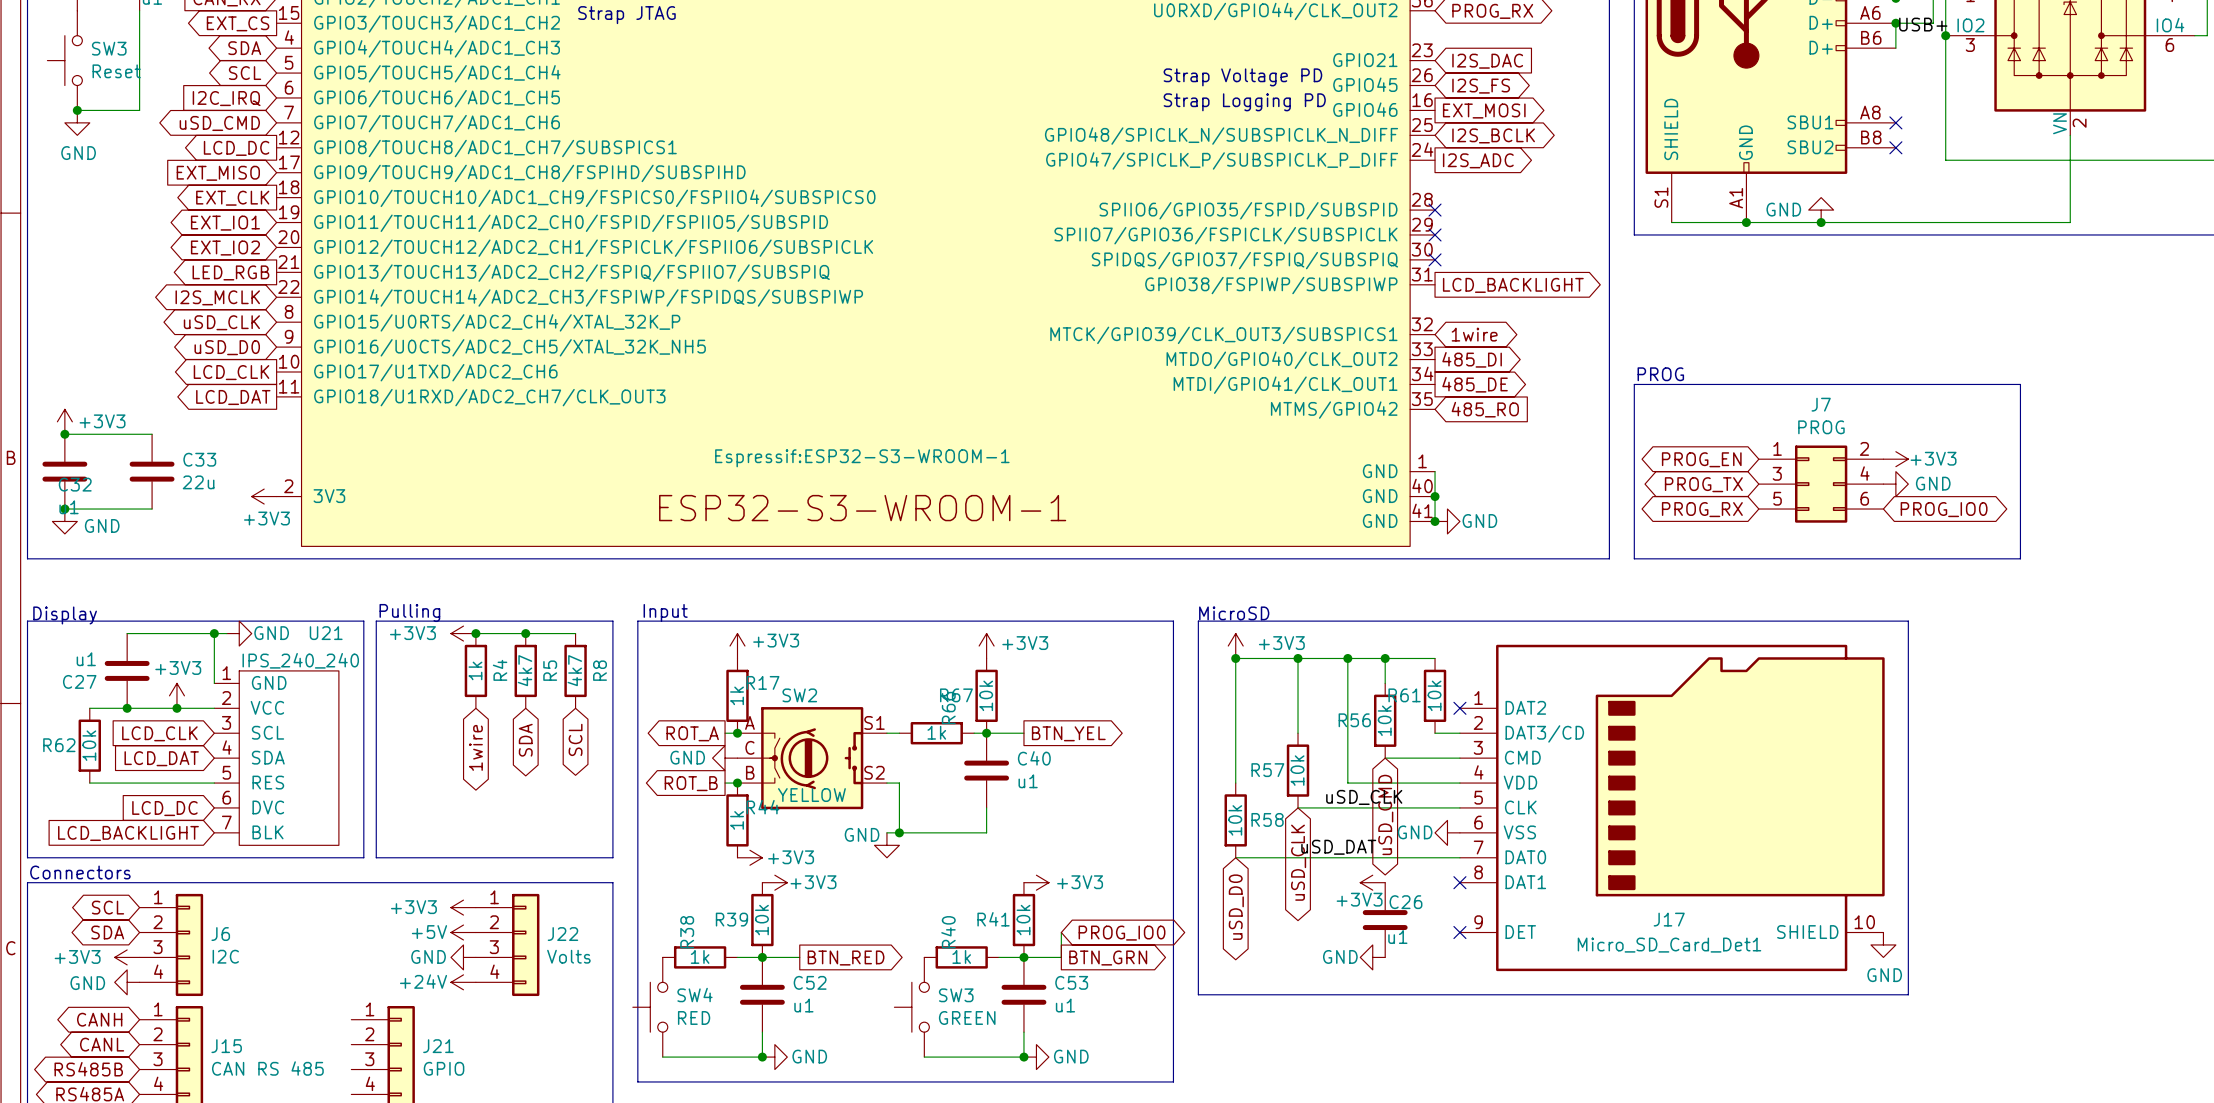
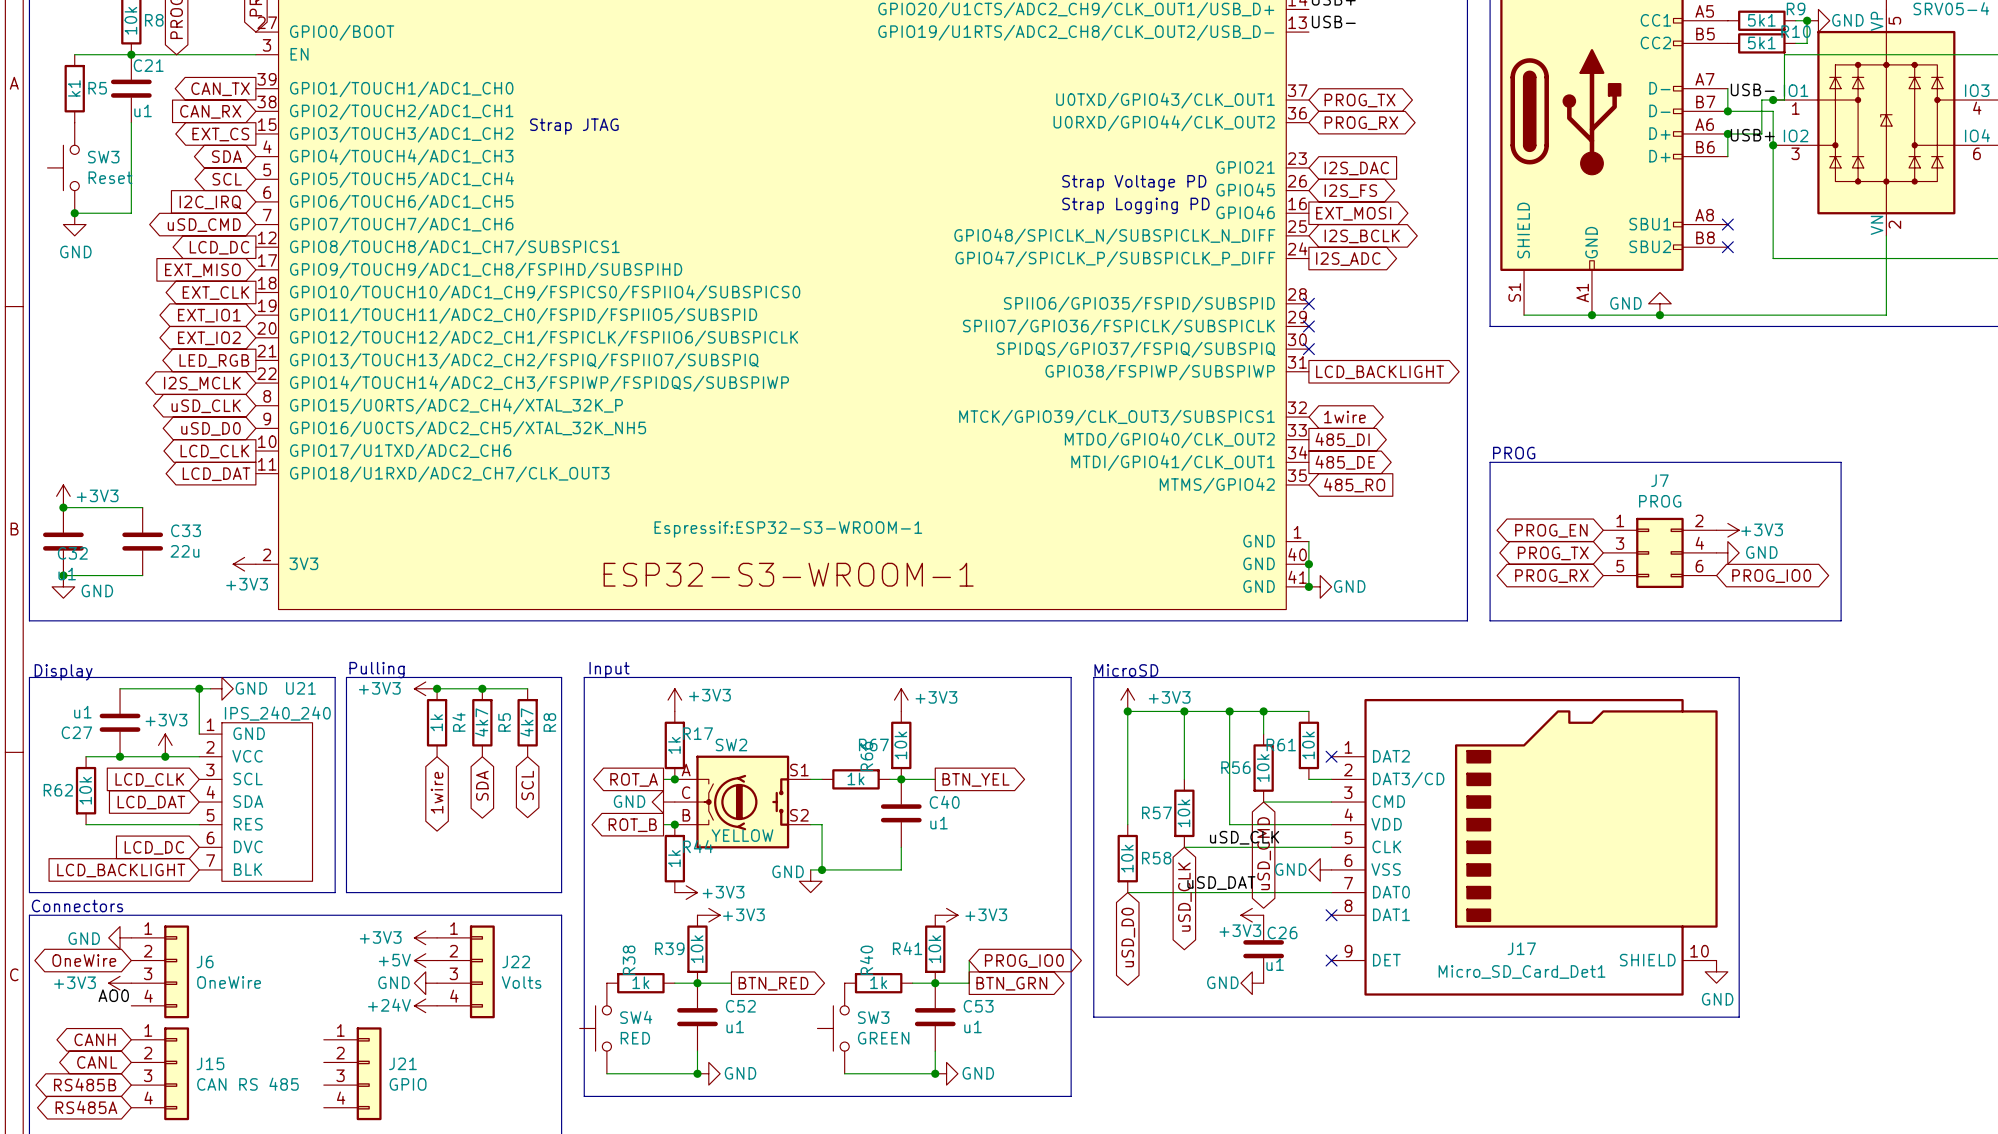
global label: SCL (108, 907) -> none
global label: SDA (107, 932) -> OneWire (84, 960)
J6 value: I2C (225, 956) -> OneWire (229, 982)
label: none -> AO0 (113, 995)
power symbol position: GND (127, 982) -> GND (120, 937)

